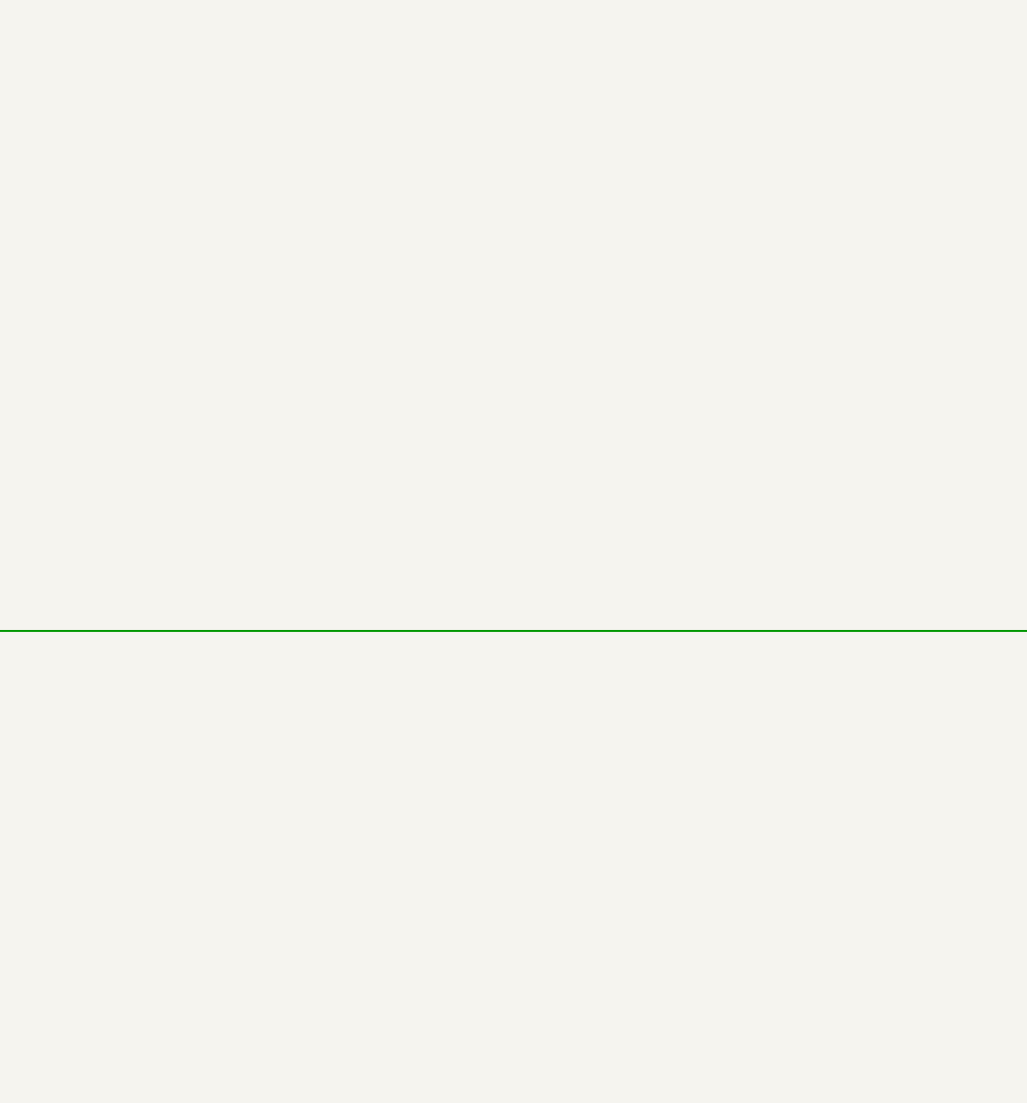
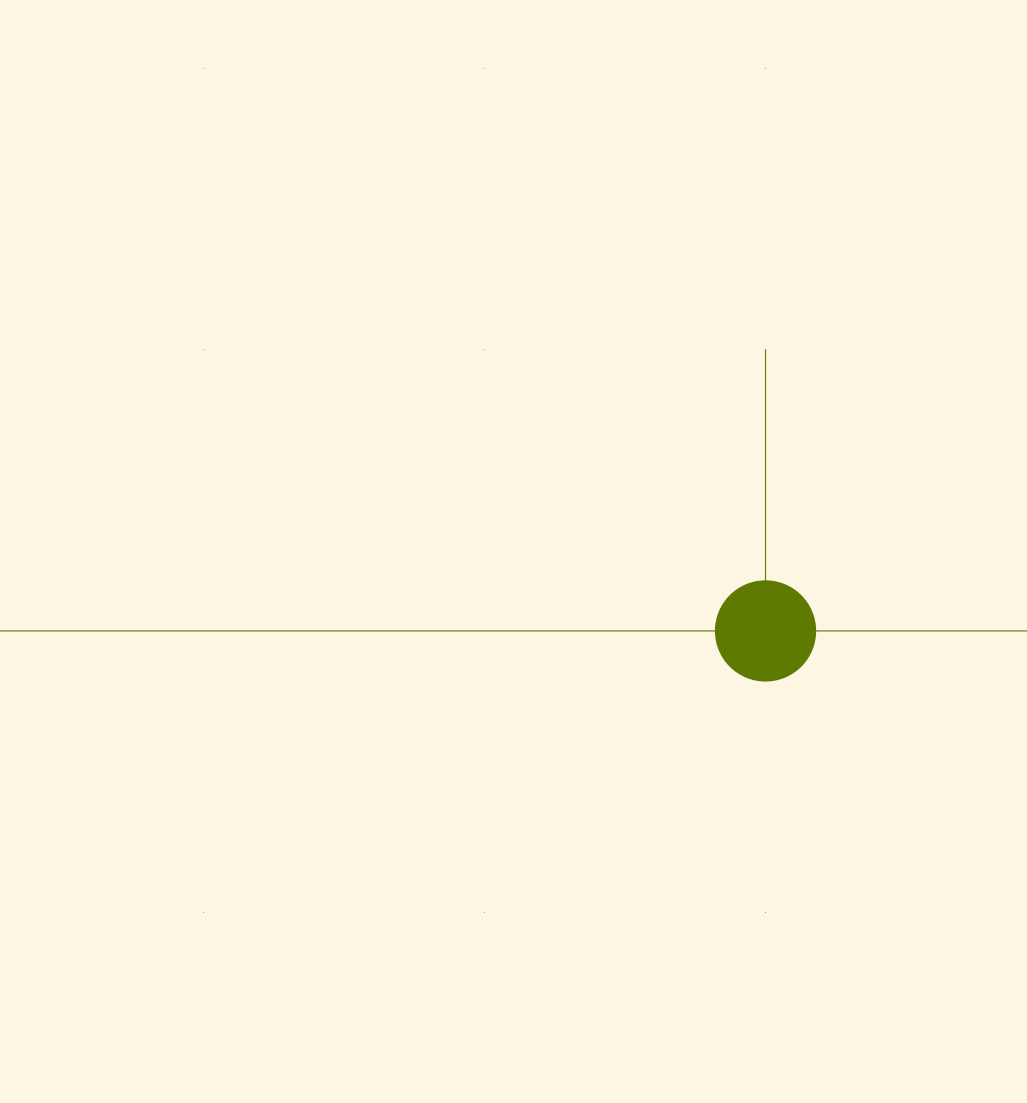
wire: none -> (765, 349) (765, 630)
junction: none -> (765, 630)

